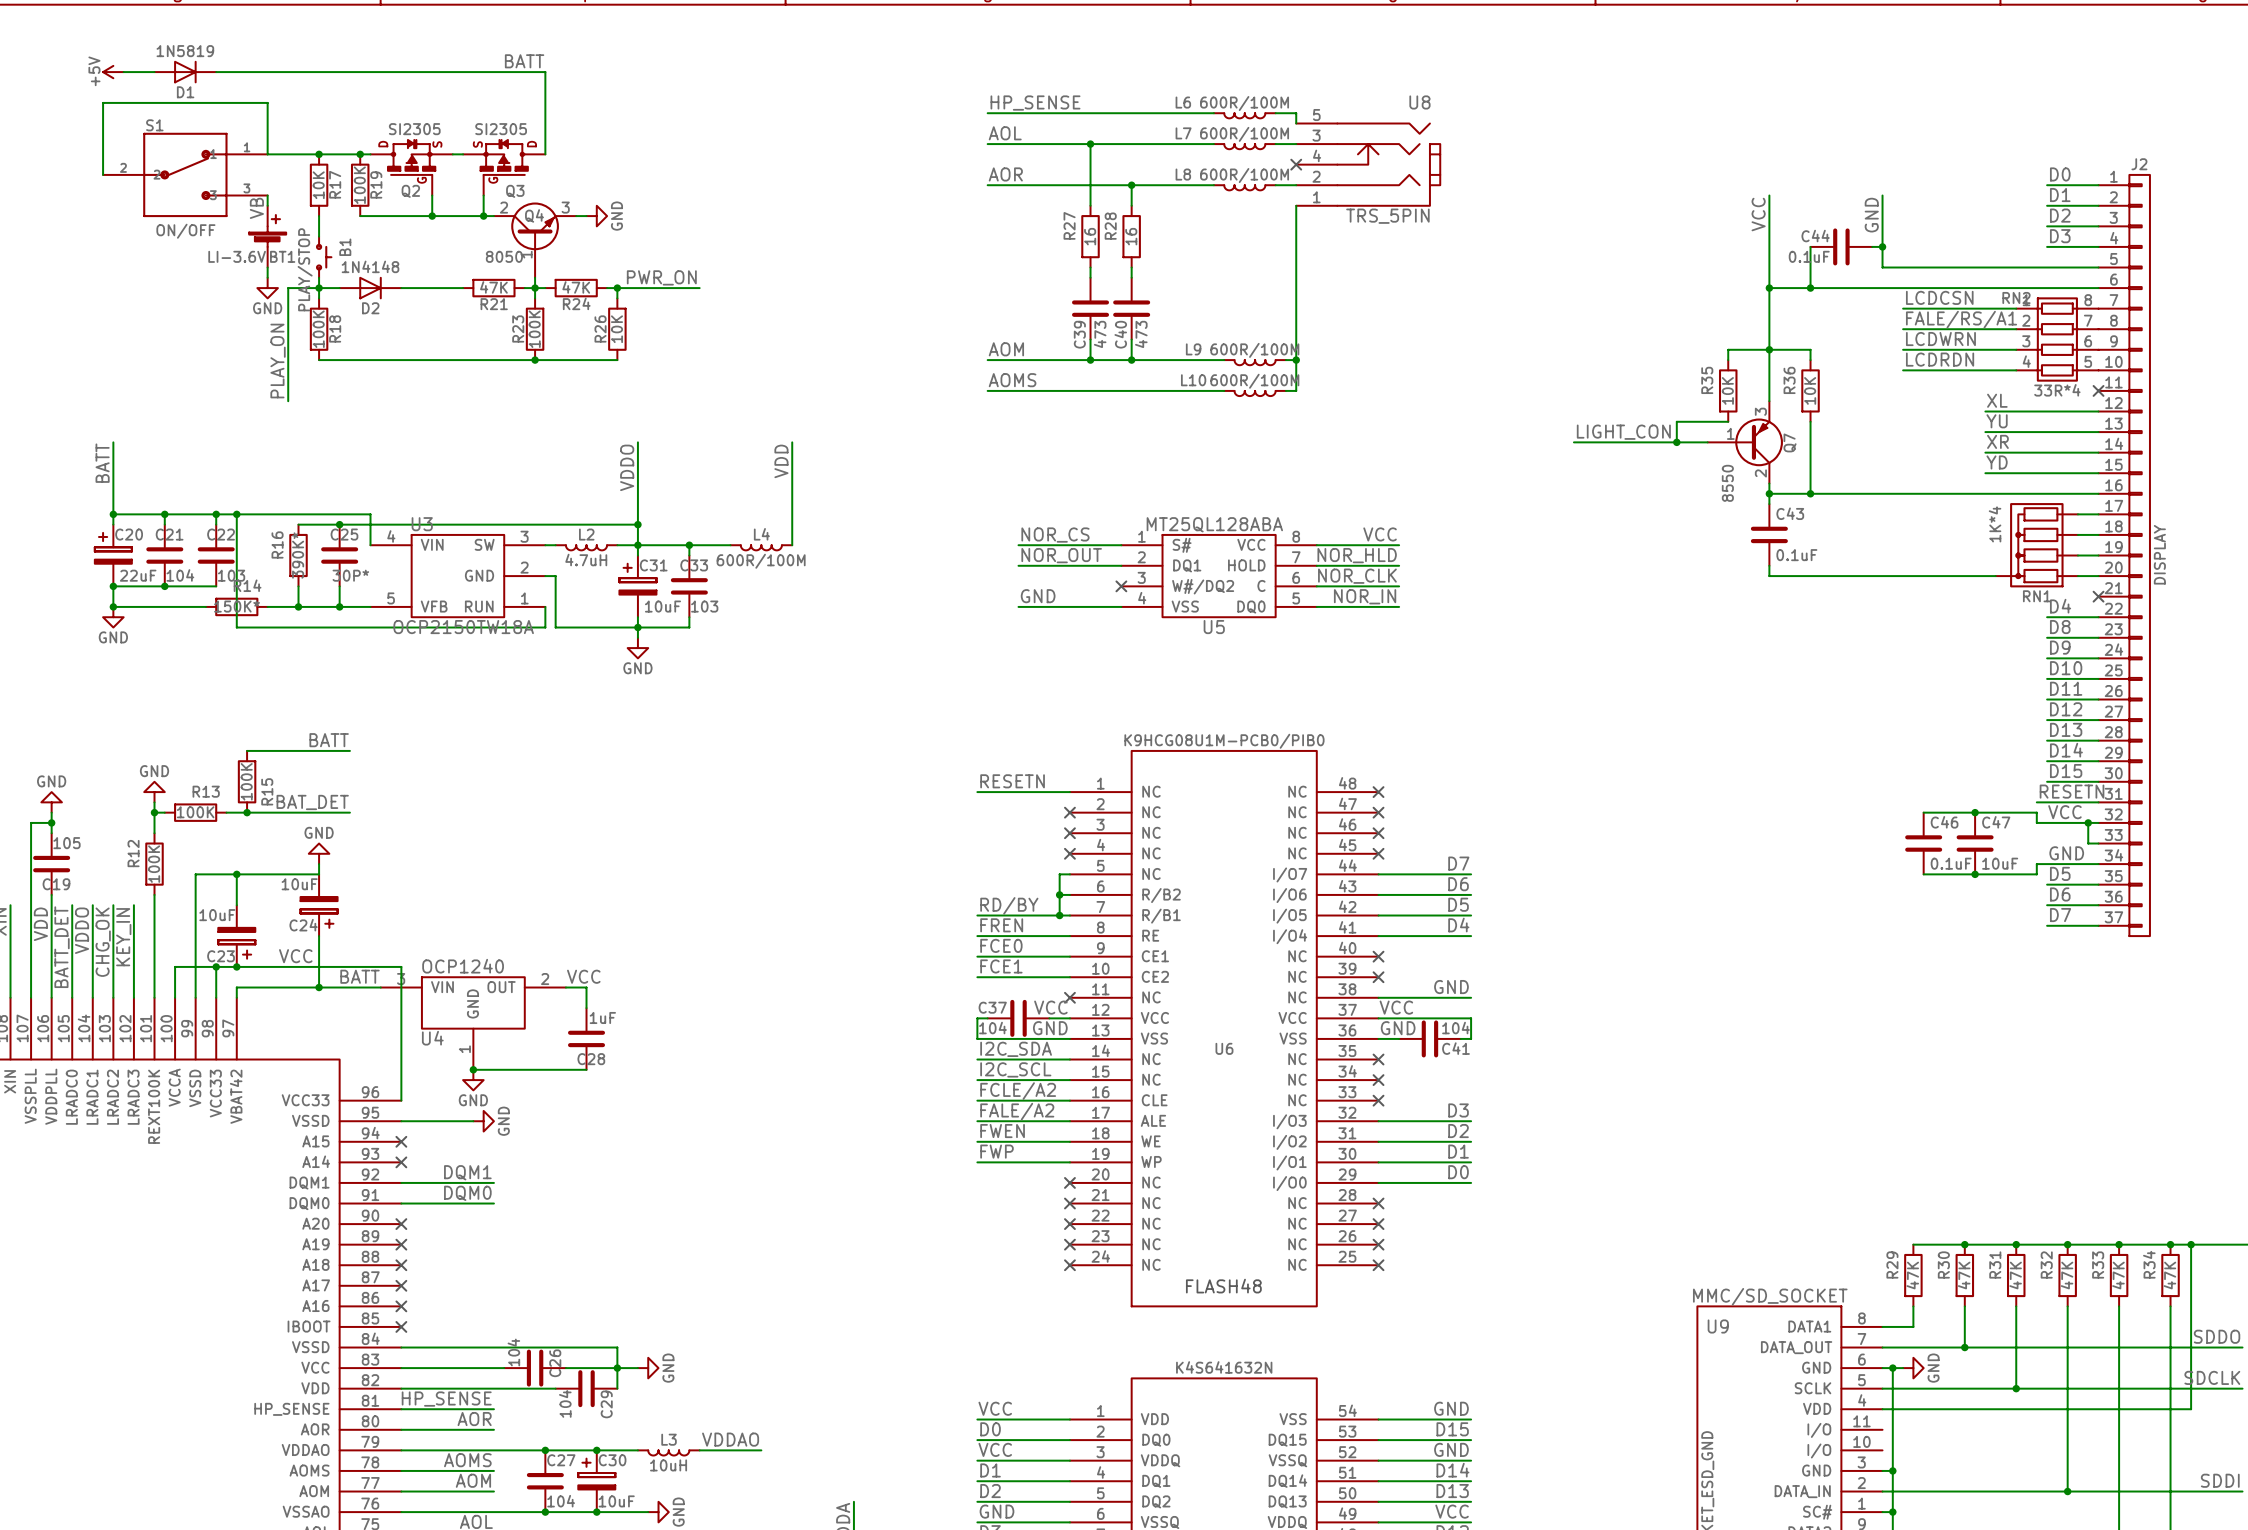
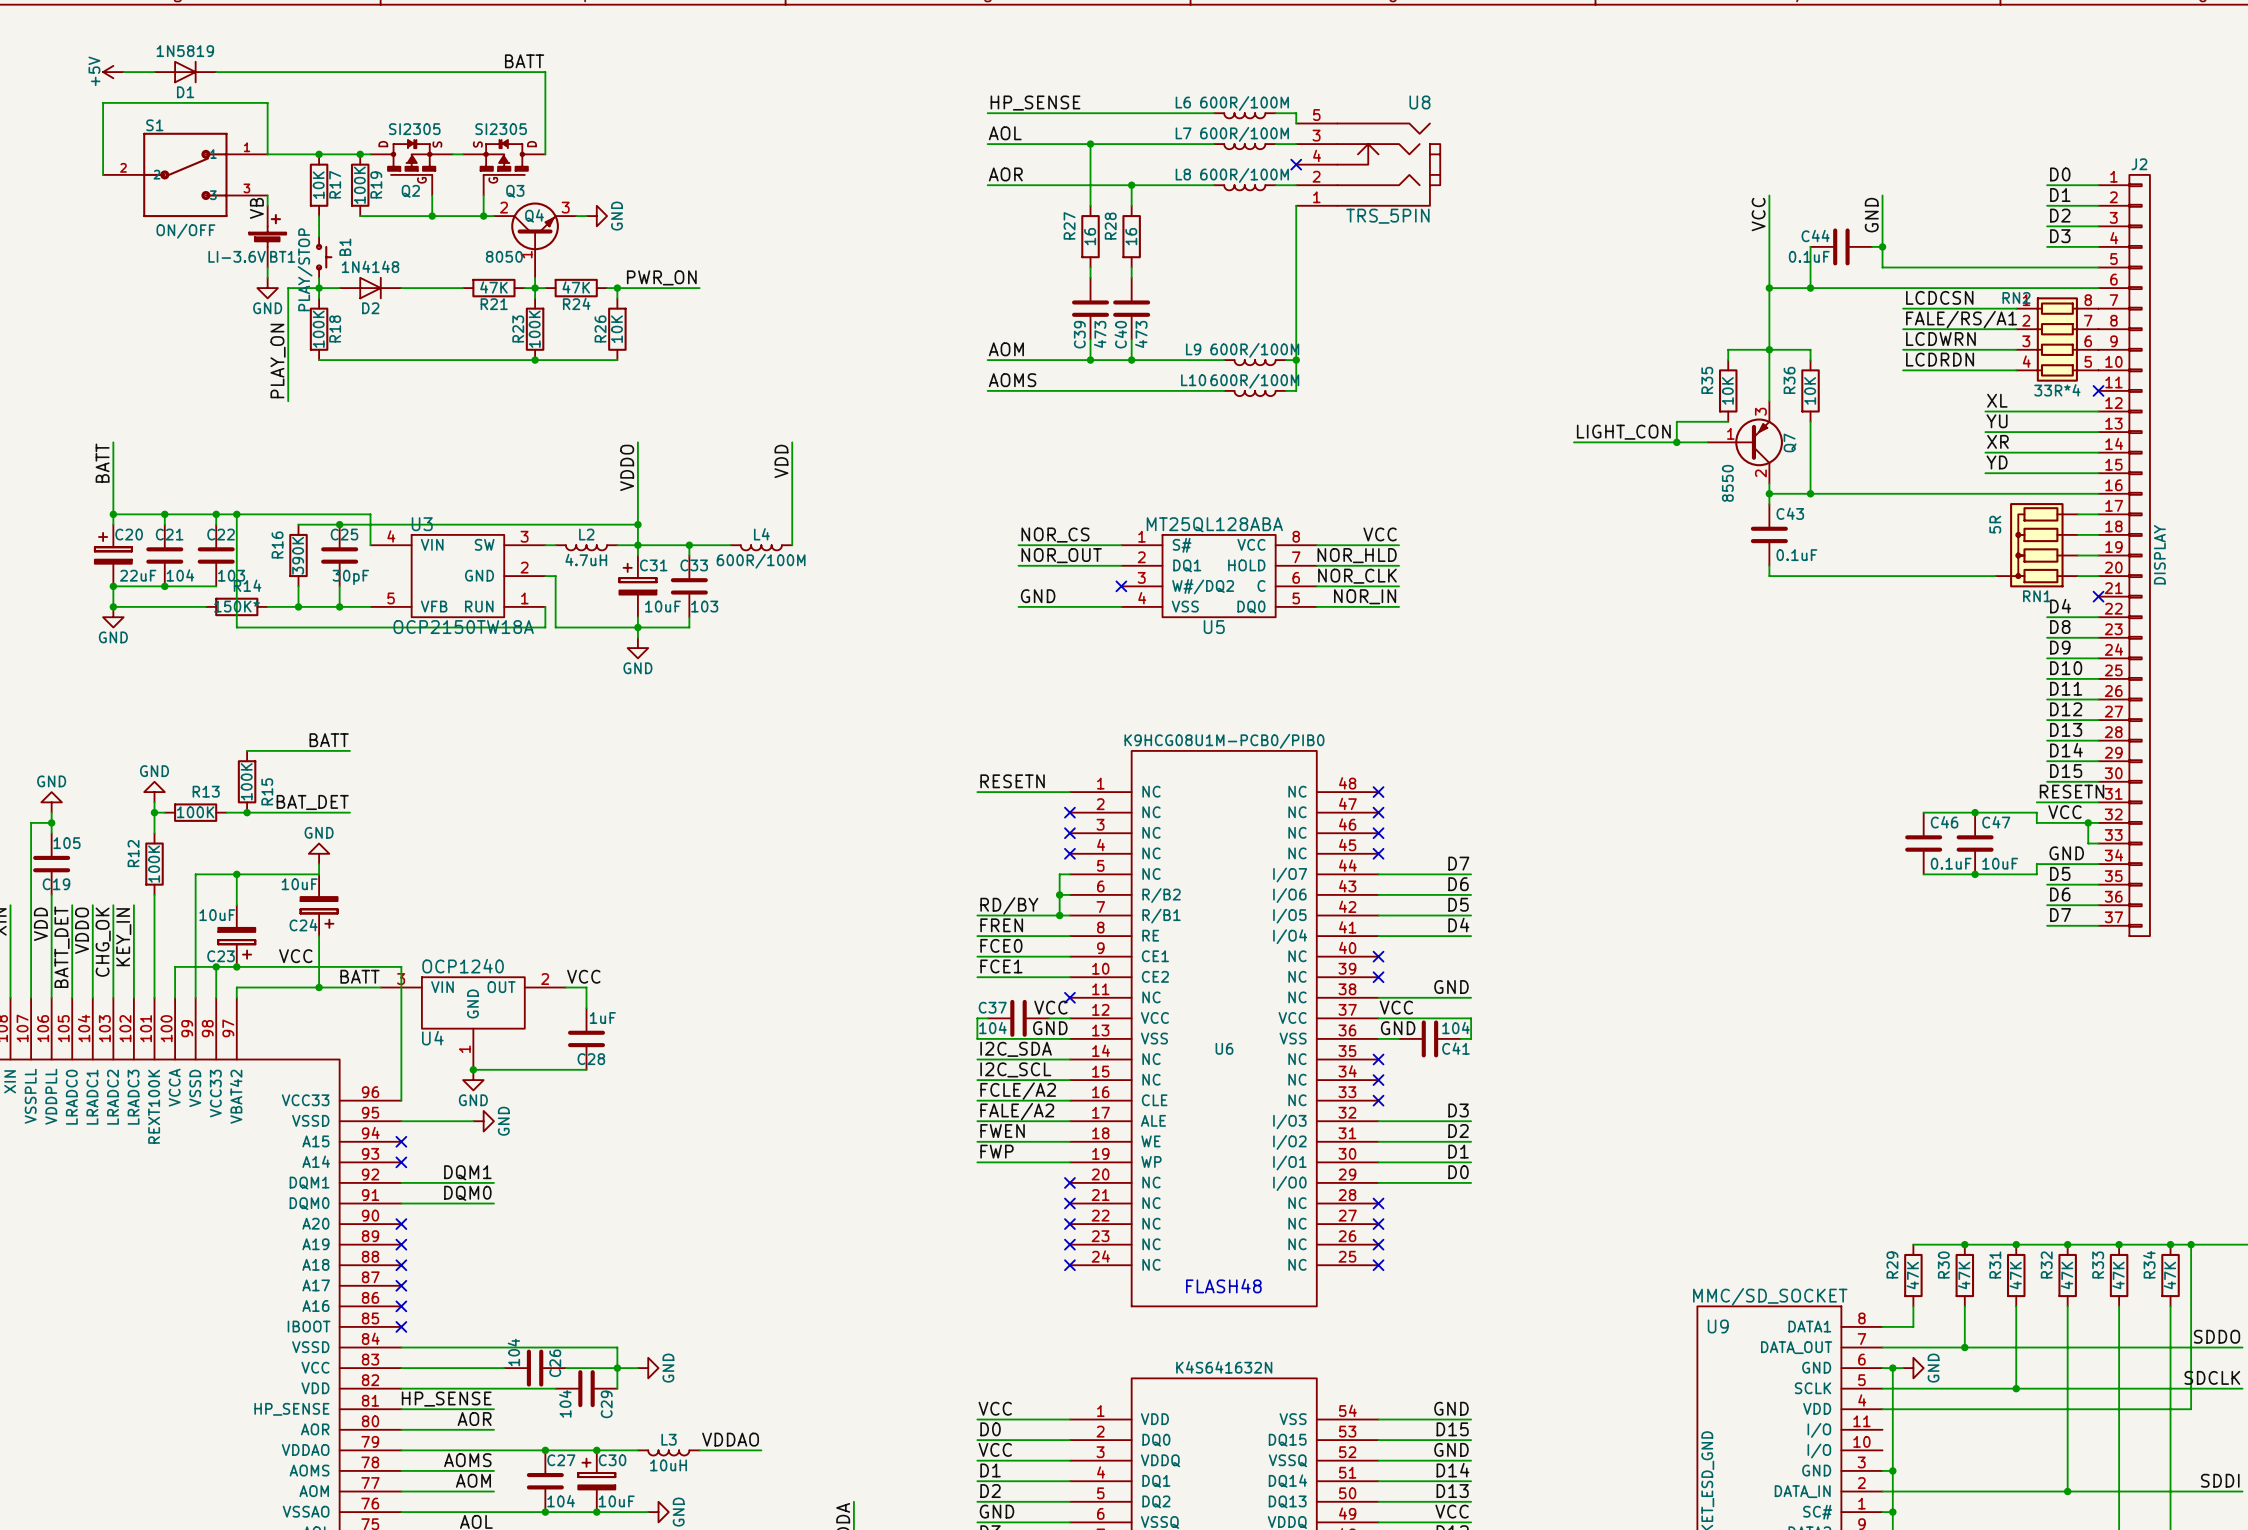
RN1 value: 1K*4 (1995, 524) -> 5R (1995, 524)
R16 value: 390K* (298, 555) -> 390K (298, 555)
C25 value: 30P* (350, 575) -> 30pF (350, 577)

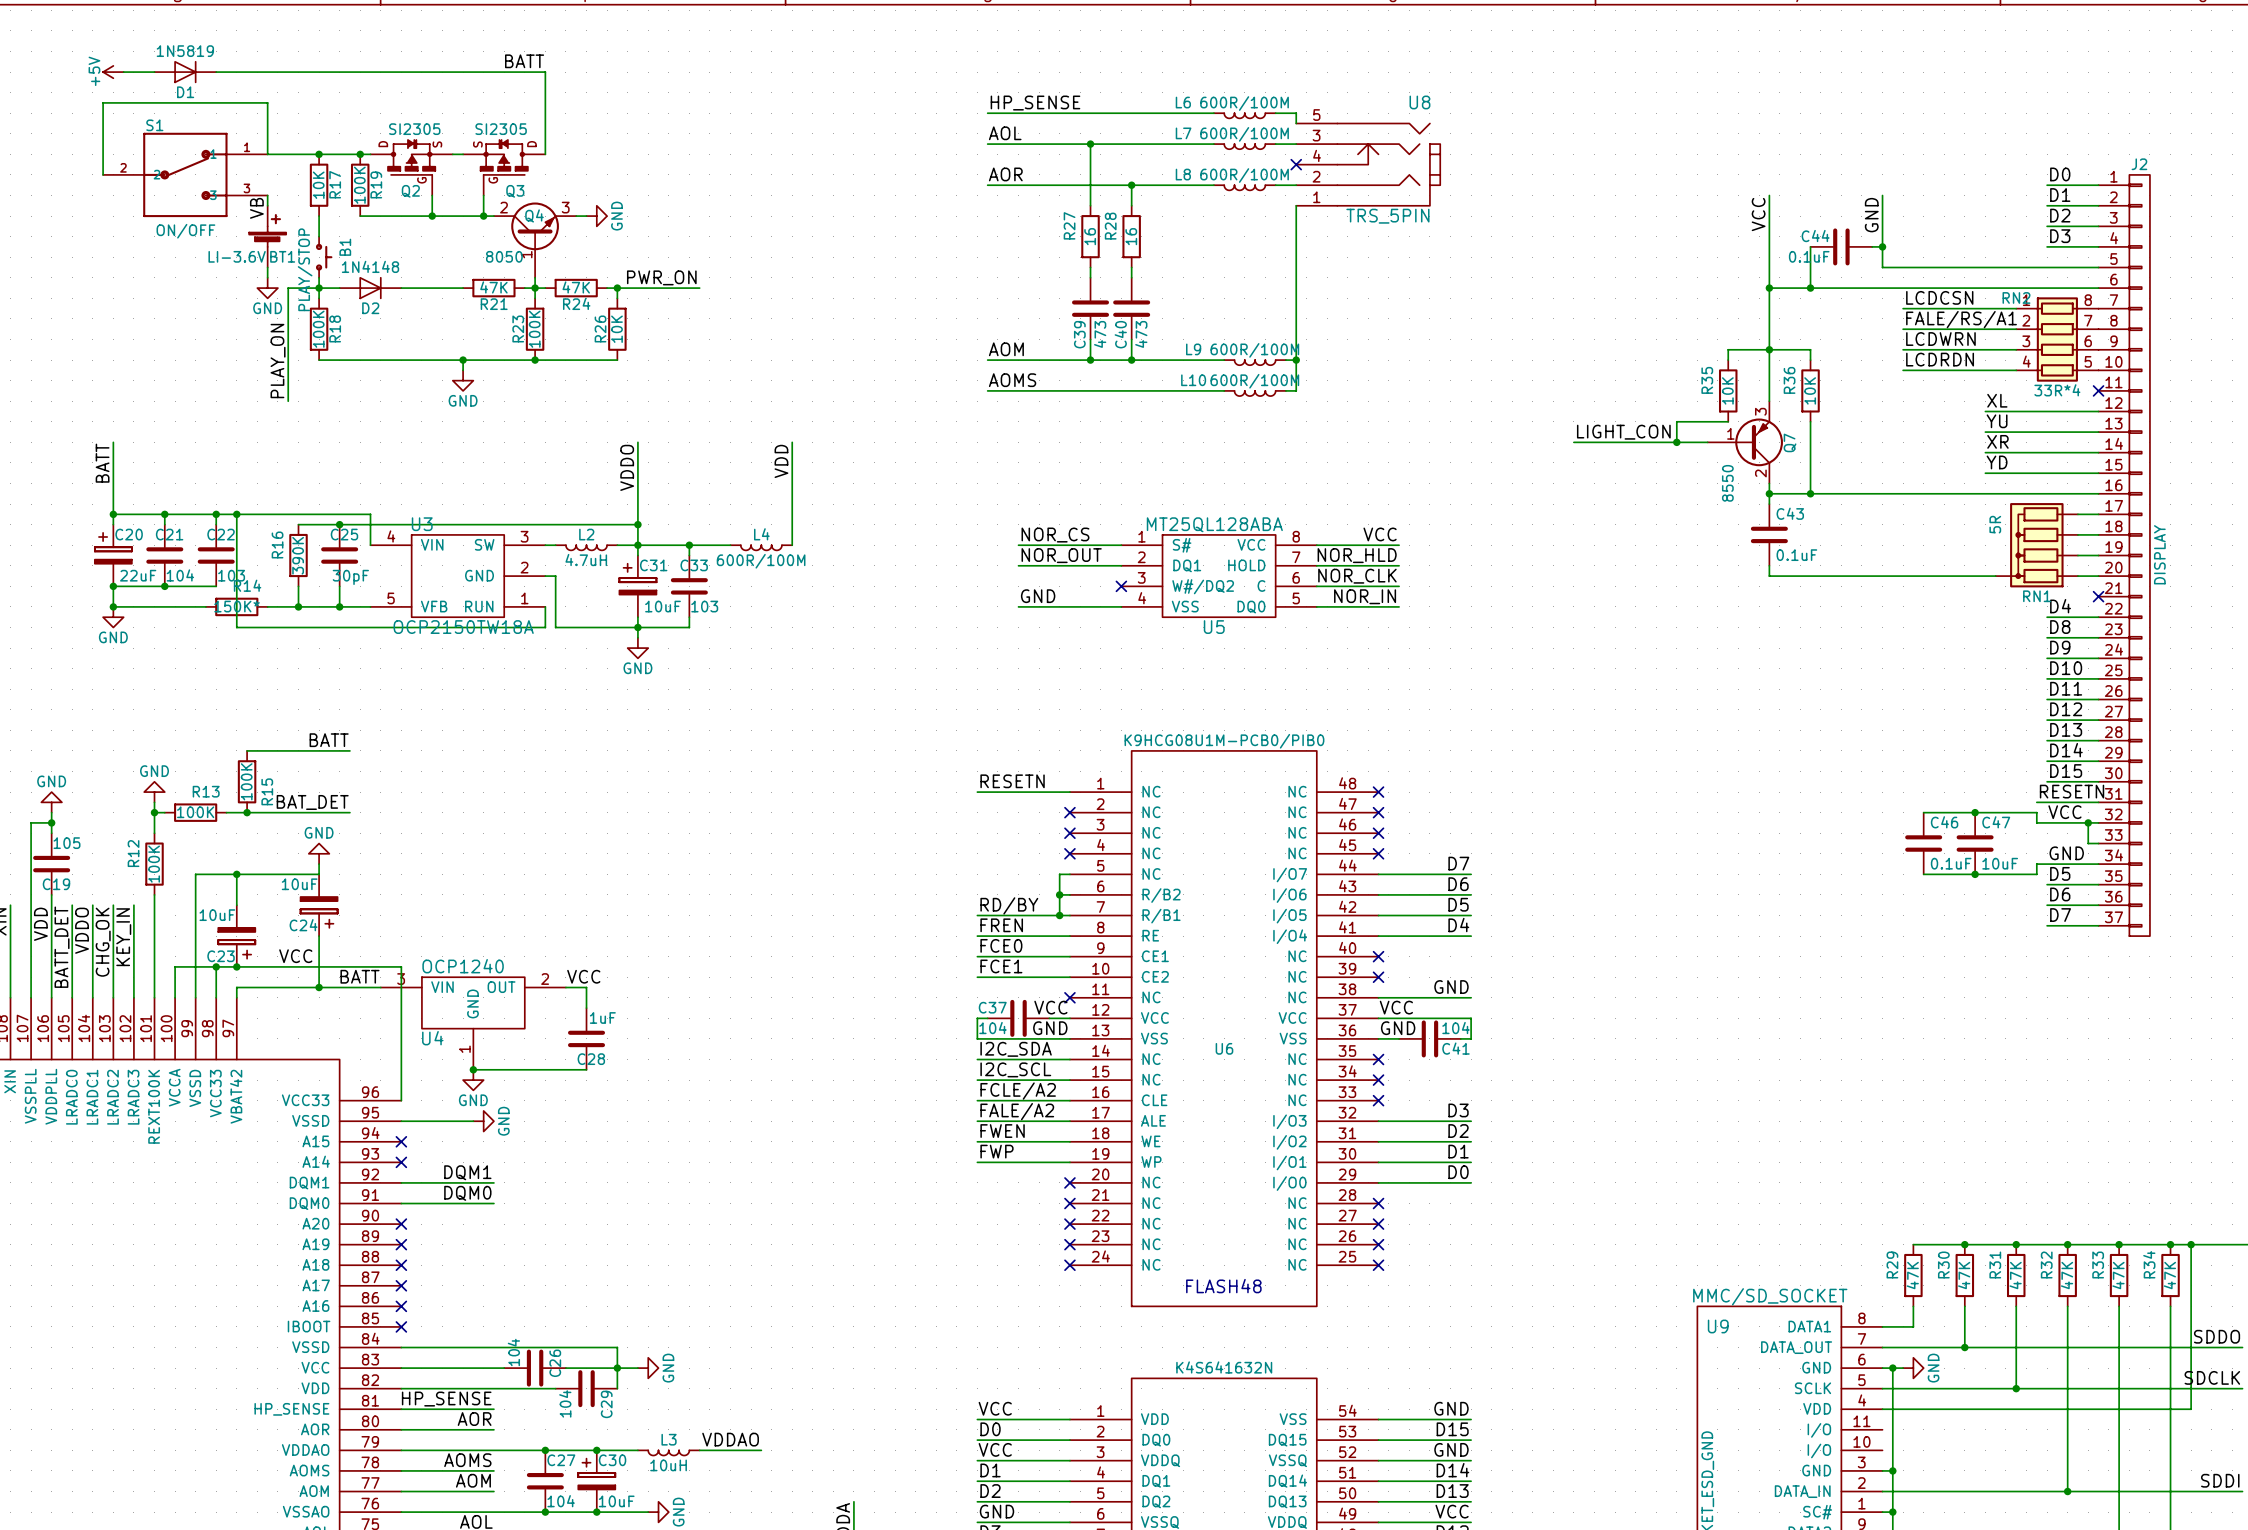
wire: none -> (463, 360) (463, 370)
junction: none -> (463, 360)
power symbol: none -> GND (463, 380)

